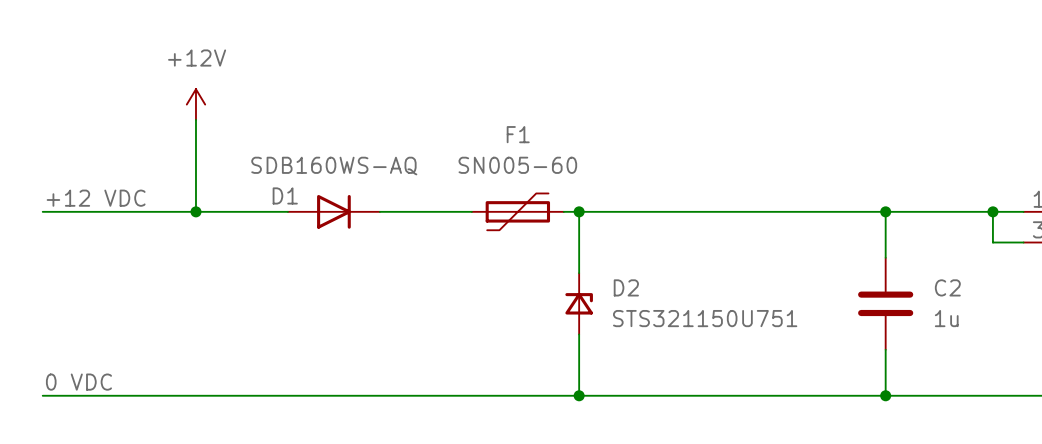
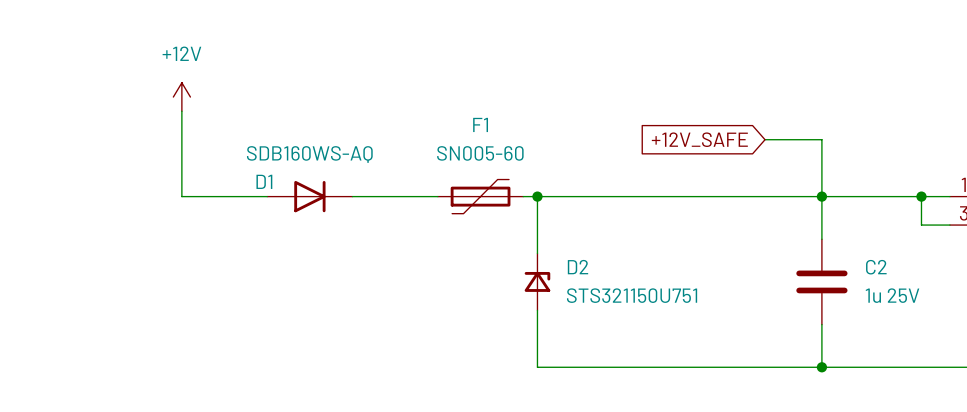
wire: none -> (765, 139) (821, 139) (821, 196)
global label: none -> +12V_SAFE (699, 139)
label: +12 VDC (96, 198) -> none
wire: (42, 211) (195, 211) -> none
junction: (195, 211) -> none
C2 value: 1u (946, 318) -> 1u 25V (892, 295)
label: 0 VDC (78, 382) -> none
wire: (42, 395) (579, 395) -> none
junction: (579, 395) -> none

